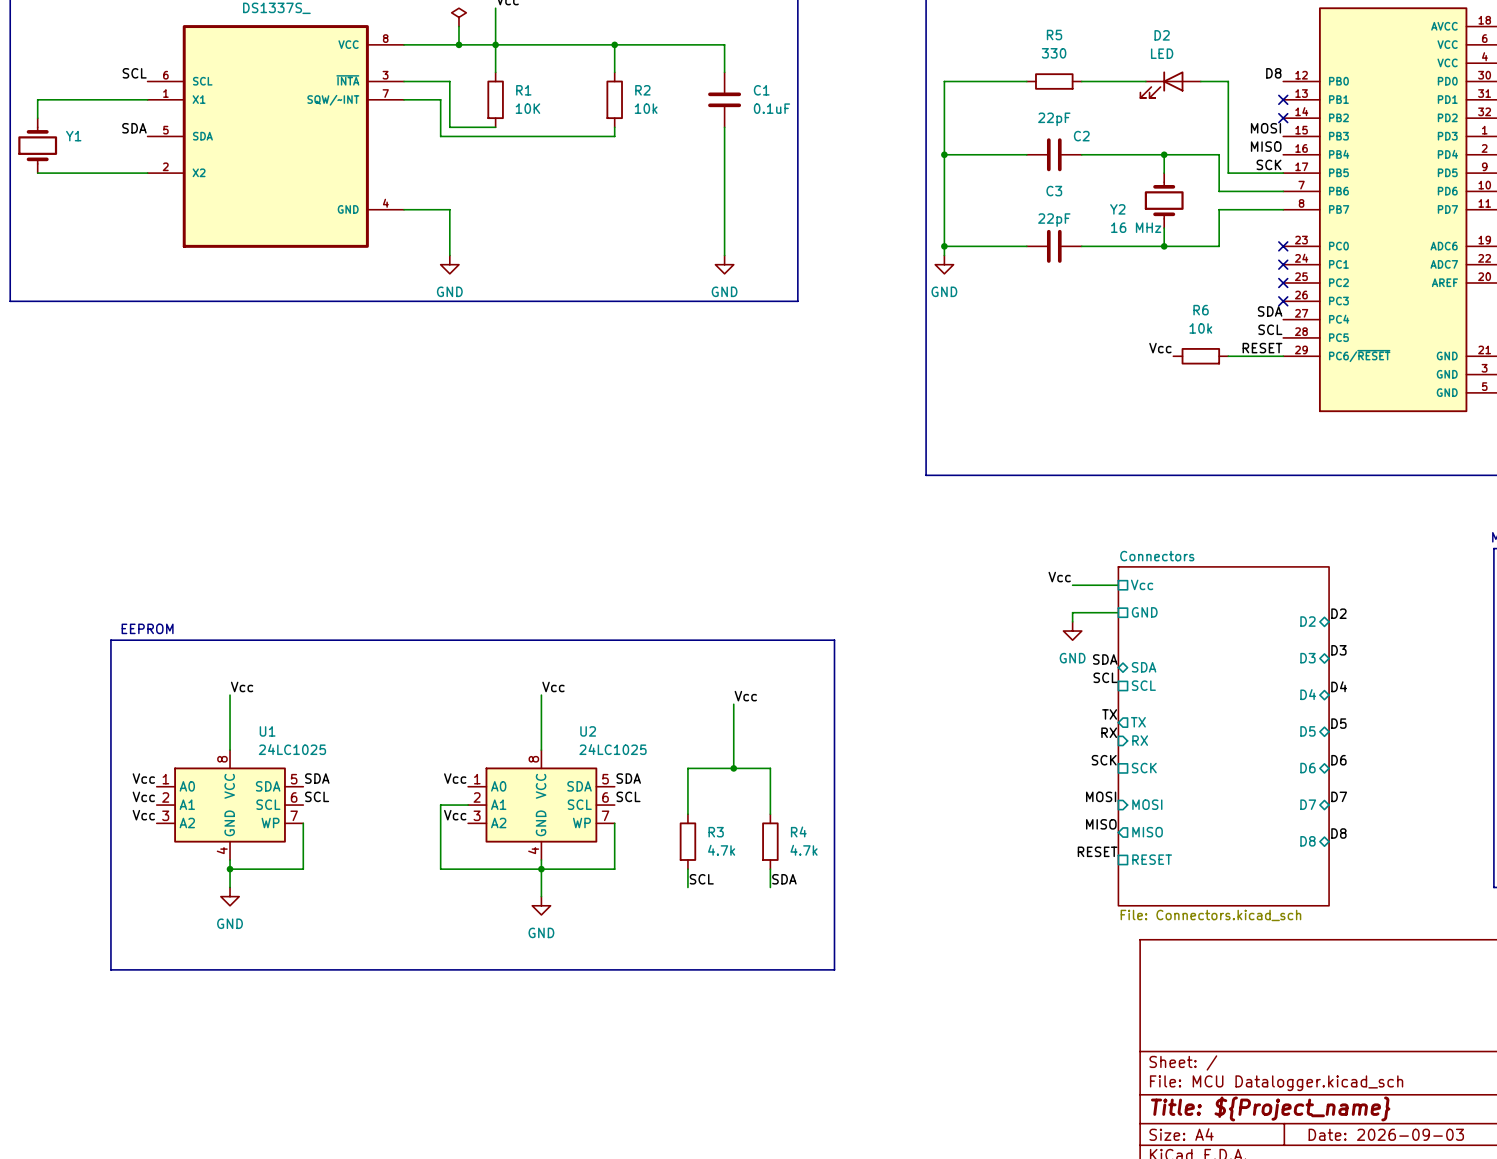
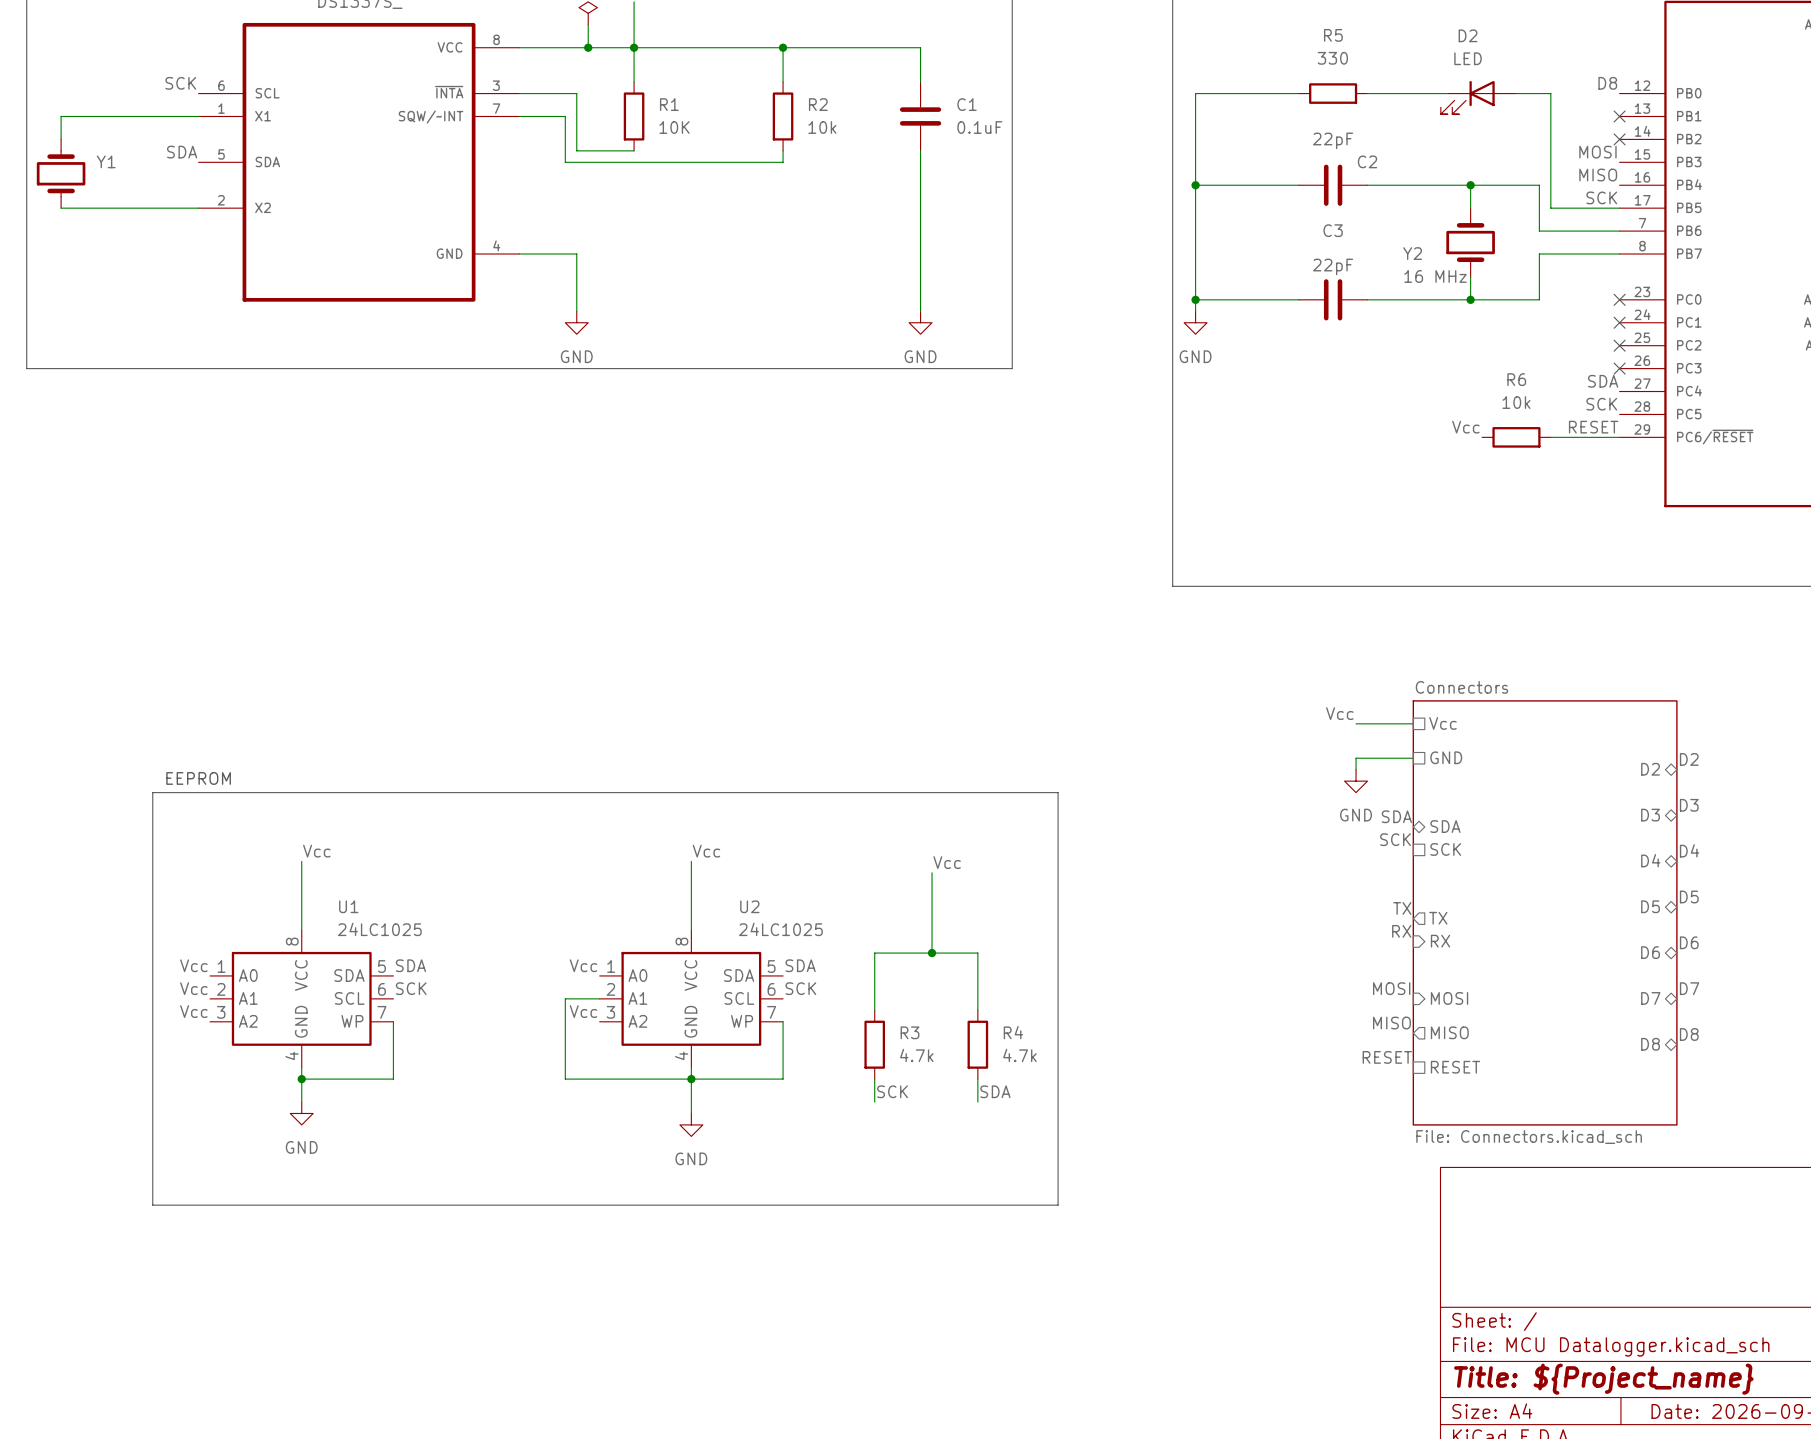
label: SCL (134, 73) -> SCK (180, 83)
label: SCL (1270, 329) -> SCK (1601, 404)
label: SCL (1105, 677) -> SCK (1395, 839)
sheet pin: SCL (1143, 685) -> SCK (1445, 849)
label: TX (1109, 714) -> none
sheet pin: TX (1138, 722) -> none
label: RX (1109, 732) -> TX (1402, 908)
sheet pin shape: input (1140, 740) -> output (1438, 918)
sheet pin: RX (1140, 740) -> TX (1438, 918)
label: none -> RX (1401, 931)
sheet pin: none -> RX (1440, 941)
label: SCK (1104, 760) -> none
sheet pin: SCK (1144, 768) -> none
label: SCL (317, 796) -> SCK (411, 988)
label: SCL (628, 796) -> SCK (800, 988)
label: SCL (701, 879) -> SCK (892, 1091)

